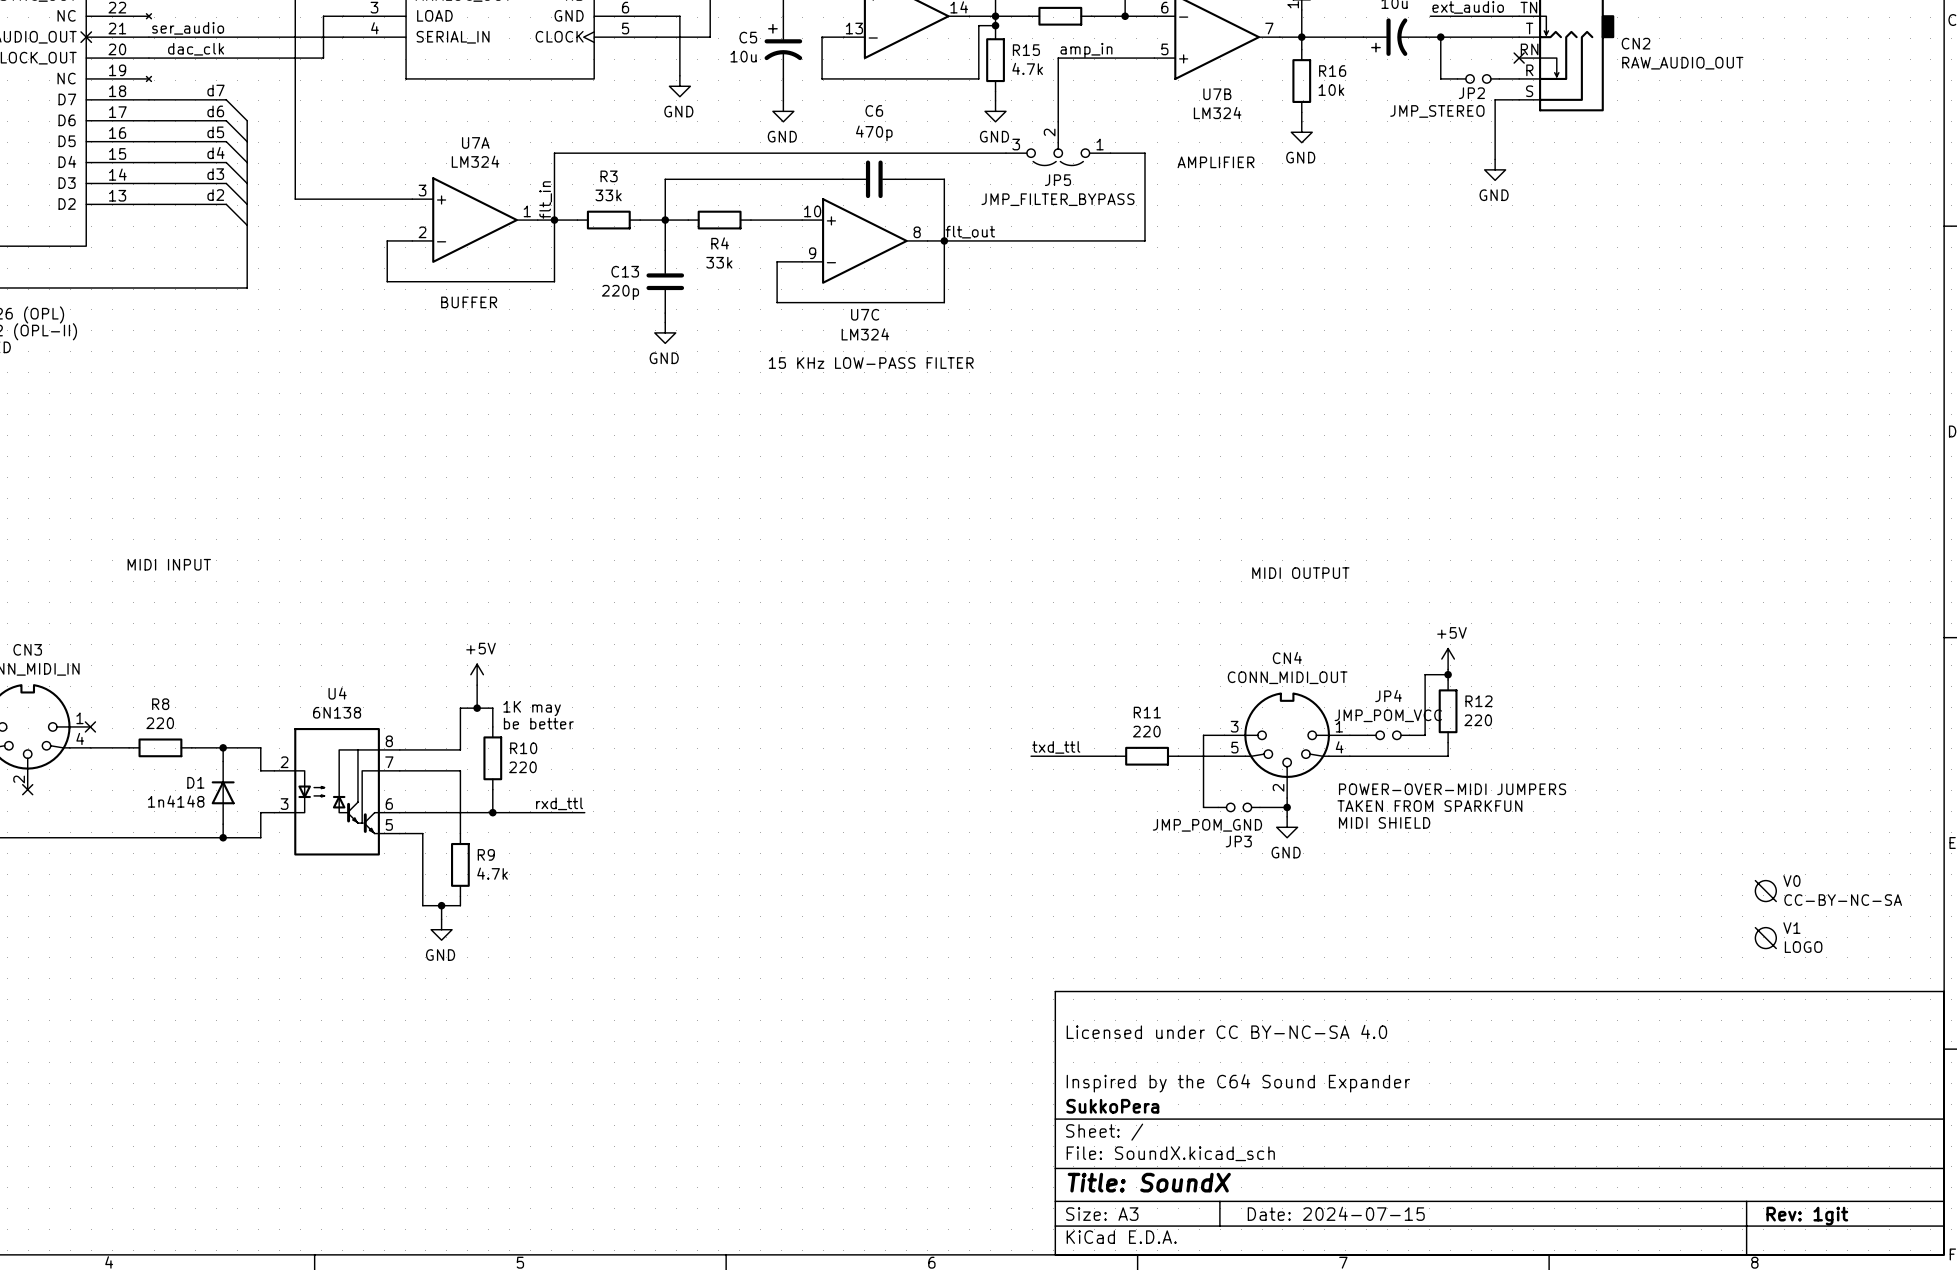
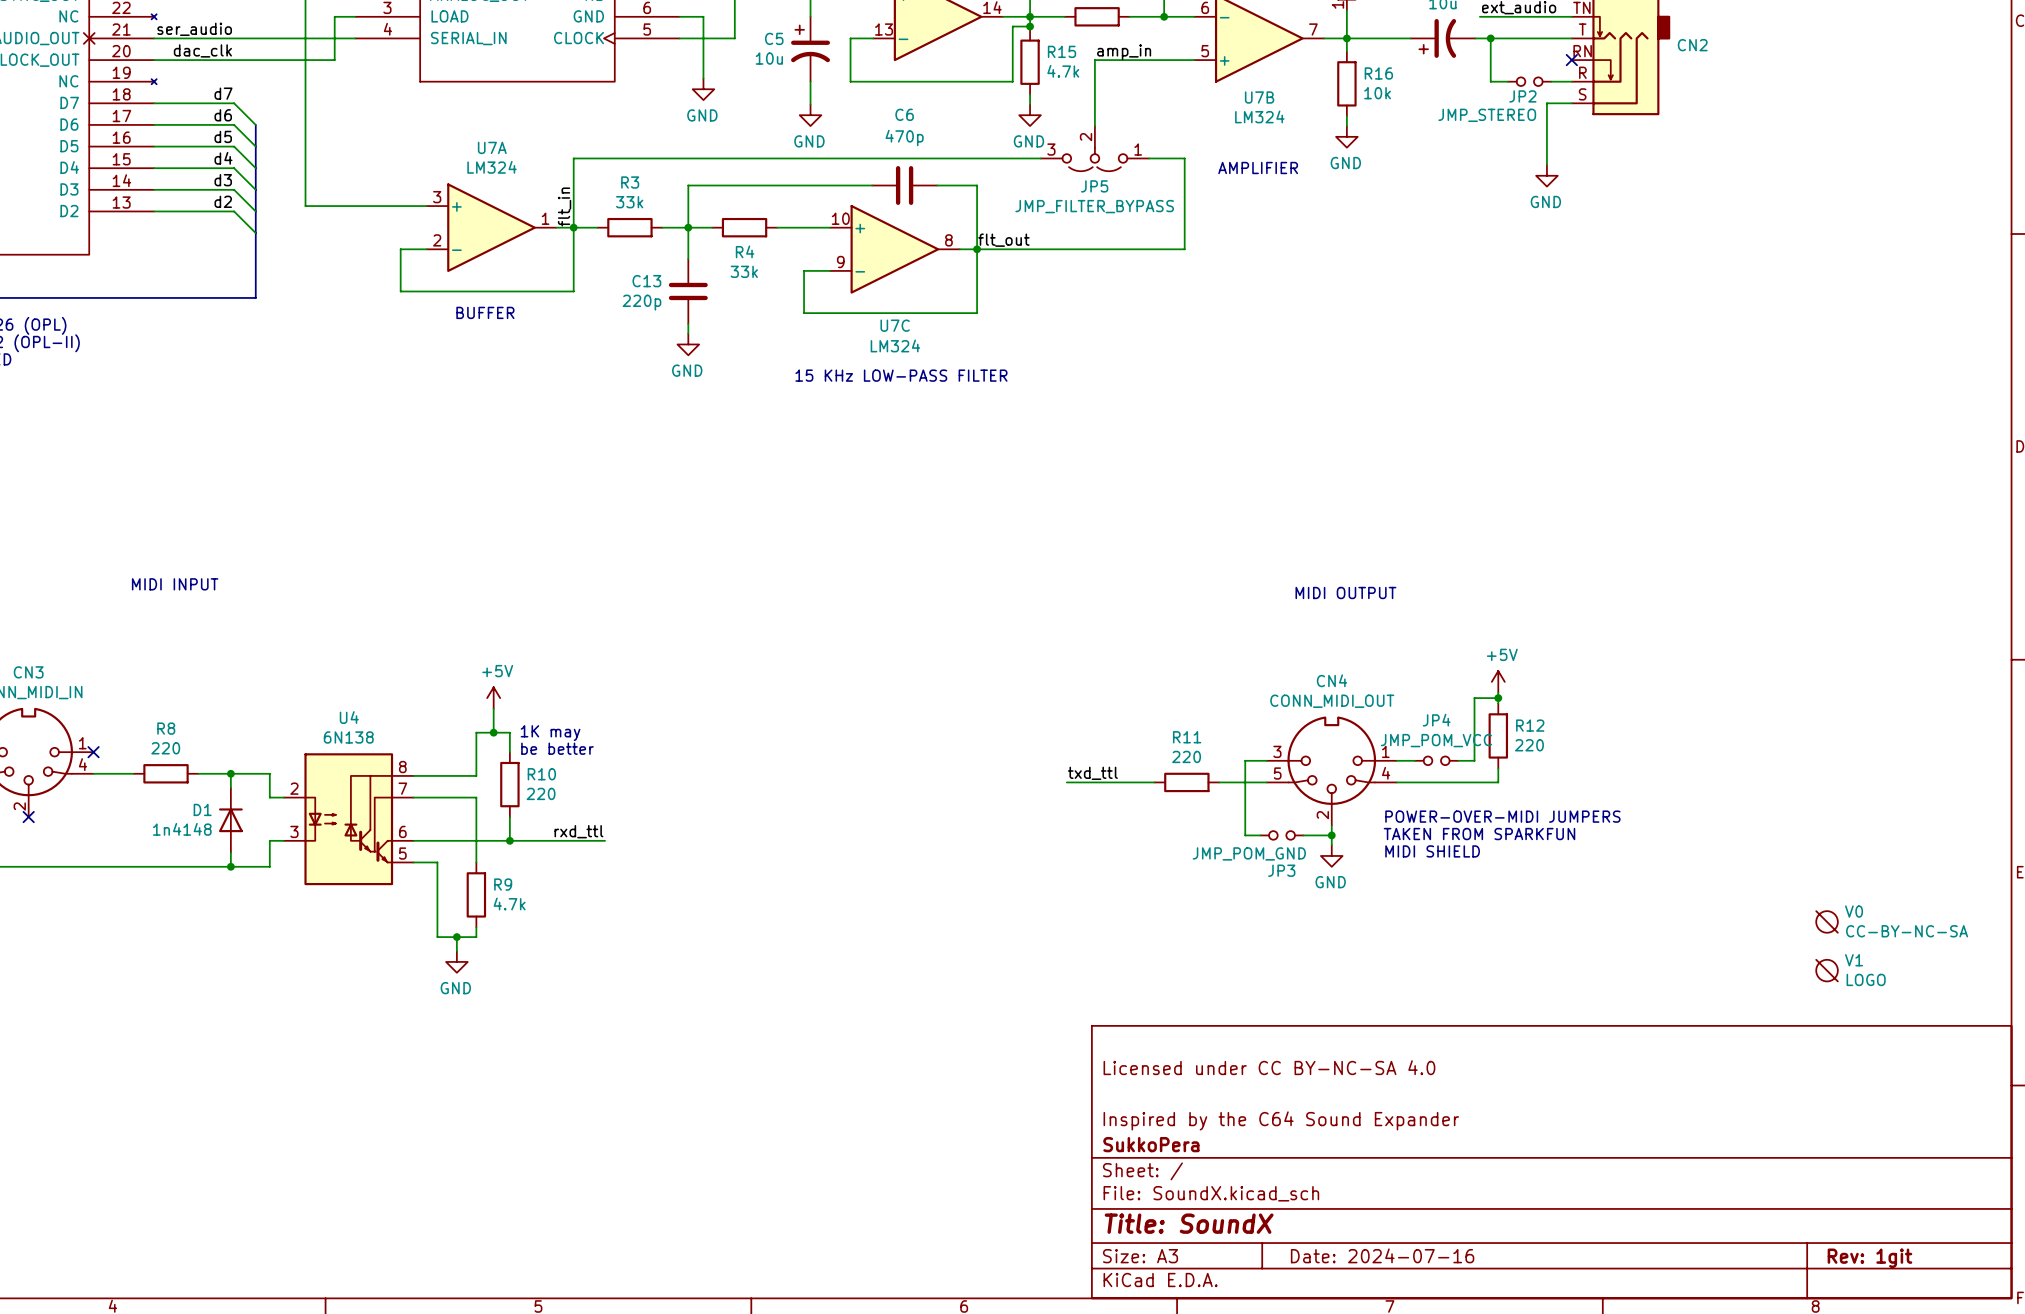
CN2 value: RAW_AUDIO_OUT (1682, 63) -> none
title block: Date: 2024-07-15 (1336, 1213) -> Date: 2024-07-16 (1382, 1255)

